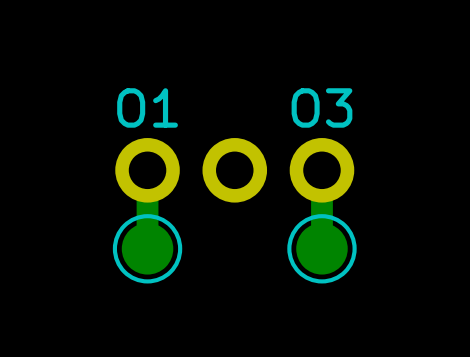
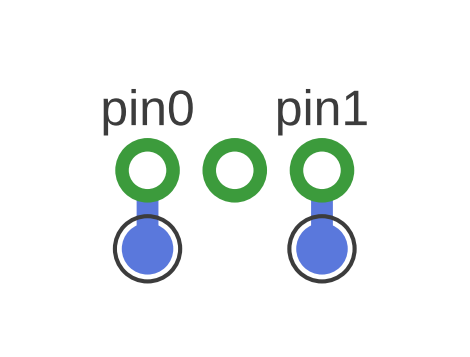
O1 name: O1 (147, 107) -> none
O3 name: O3 (321, 107) -> none
text: none -> pin0 (148, 112)
text: none -> pin1 (322, 112)

